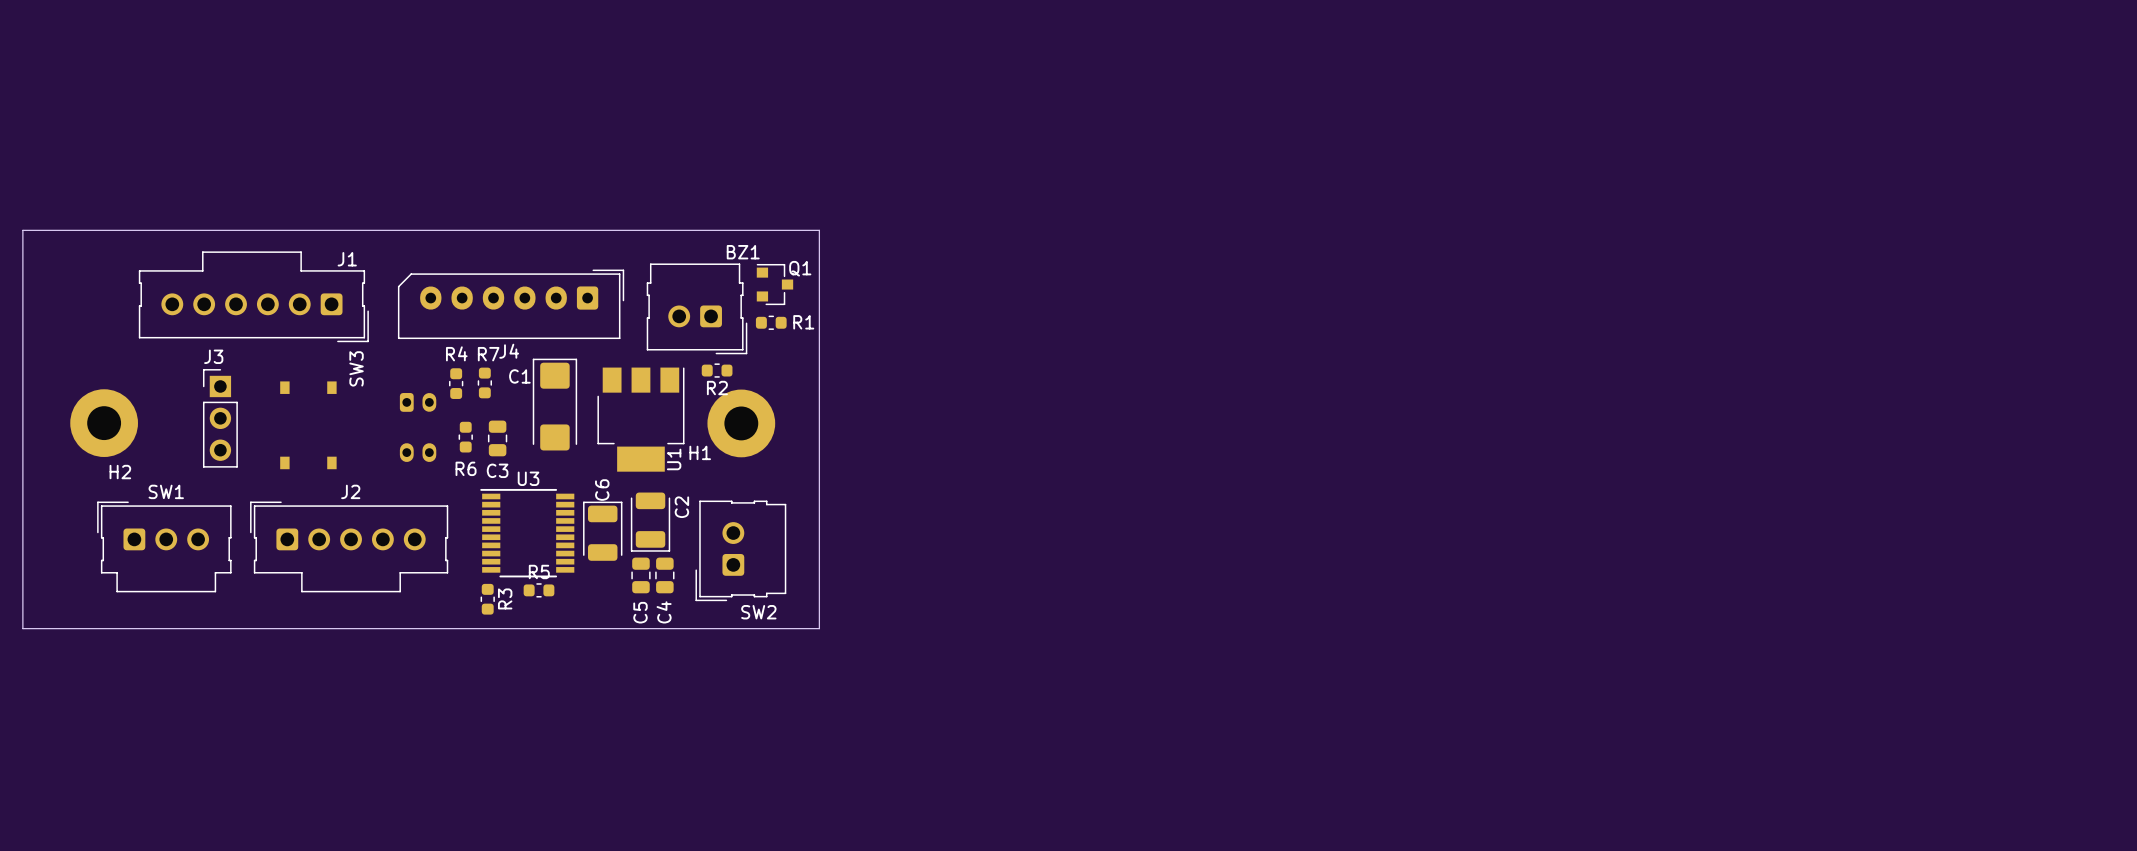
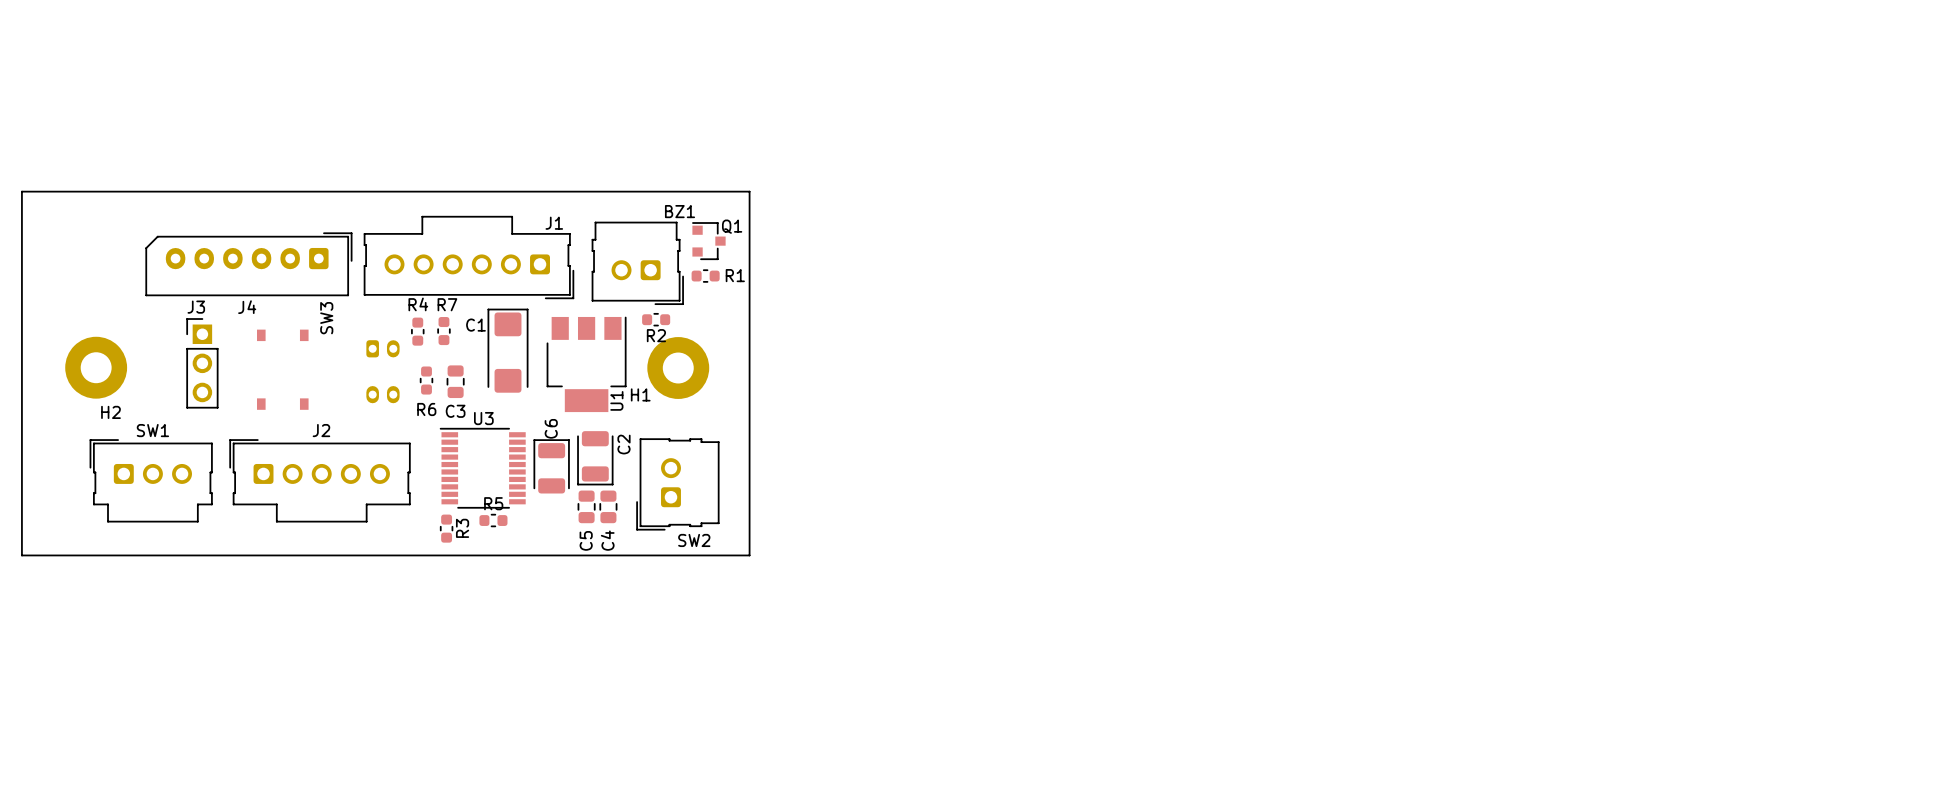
J1 position: (253, 296) -> (468, 257)
J4 position: (511, 304) -> (248, 264)

